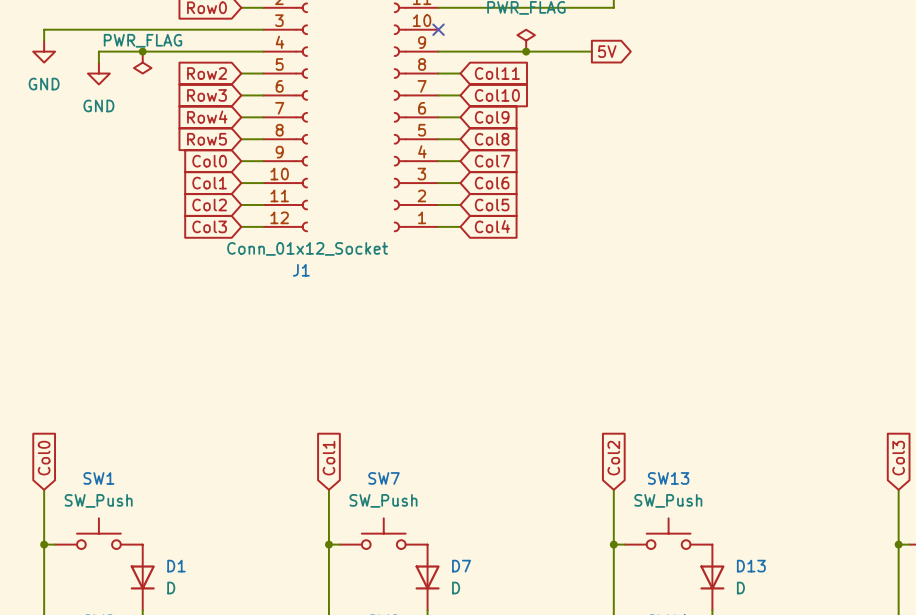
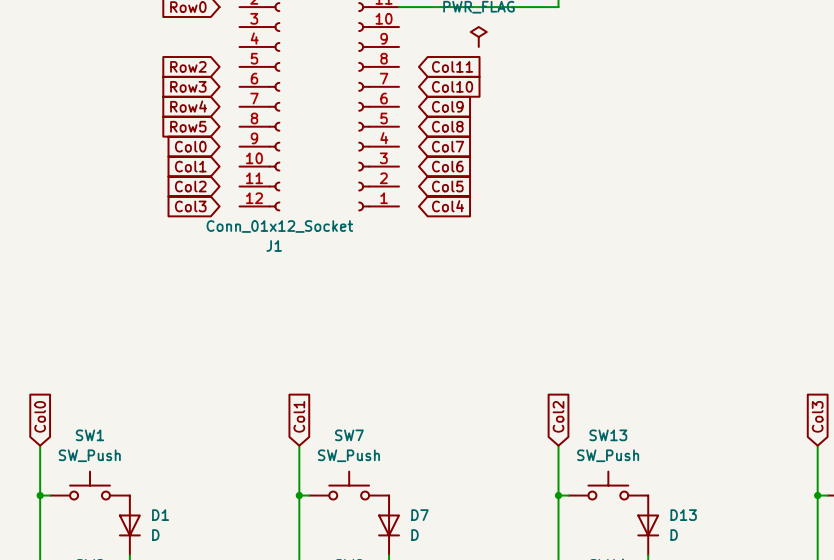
wire: (241, 7) (263, 7) -> none
wire: (263, 29) (44, 29) (44, 40) -> none
no-connect mark: (438, 29) -> none
power symbol: GND (44, 51) -> none
junction: (142, 51) -> none
wire: (263, 51) (98, 51) (98, 62) -> none
wire: (438, 51) (591, 51) -> none
junction: (526, 51) -> none
global label: 5V (607, 51) -> none
power symbol: PWR_FLAG (142, 62) -> none
power symbol: GND (98, 73) -> none
wire: (241, 73) (263, 73) -> none
wire: (438, 73) (460, 73) -> none
wire: (241, 95) (263, 95) -> none
wire: (438, 95) (460, 95) -> none
wire: (241, 117) (263, 117) -> none
wire: (438, 117) (460, 117) -> none
wire: (241, 139) (263, 139) -> none
wire: (438, 139) (460, 139) -> none
wire: (241, 161) (263, 161) -> none
wire: (438, 161) (460, 161) -> none
wire: (241, 183) (263, 183) -> none
wire: (438, 183) (460, 183) -> none
wire: (241, 204) (263, 204) -> none
wire: (438, 204) (460, 204) -> none
wire: (241, 226) (263, 226) -> none
wire: (438, 226) (460, 226) -> none

